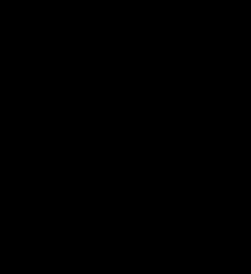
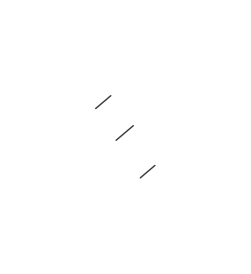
line: none -> (110, 95) (95, 108)
line: none -> (133, 125) (116, 140)
line: none -> (154, 165) (140, 177)

